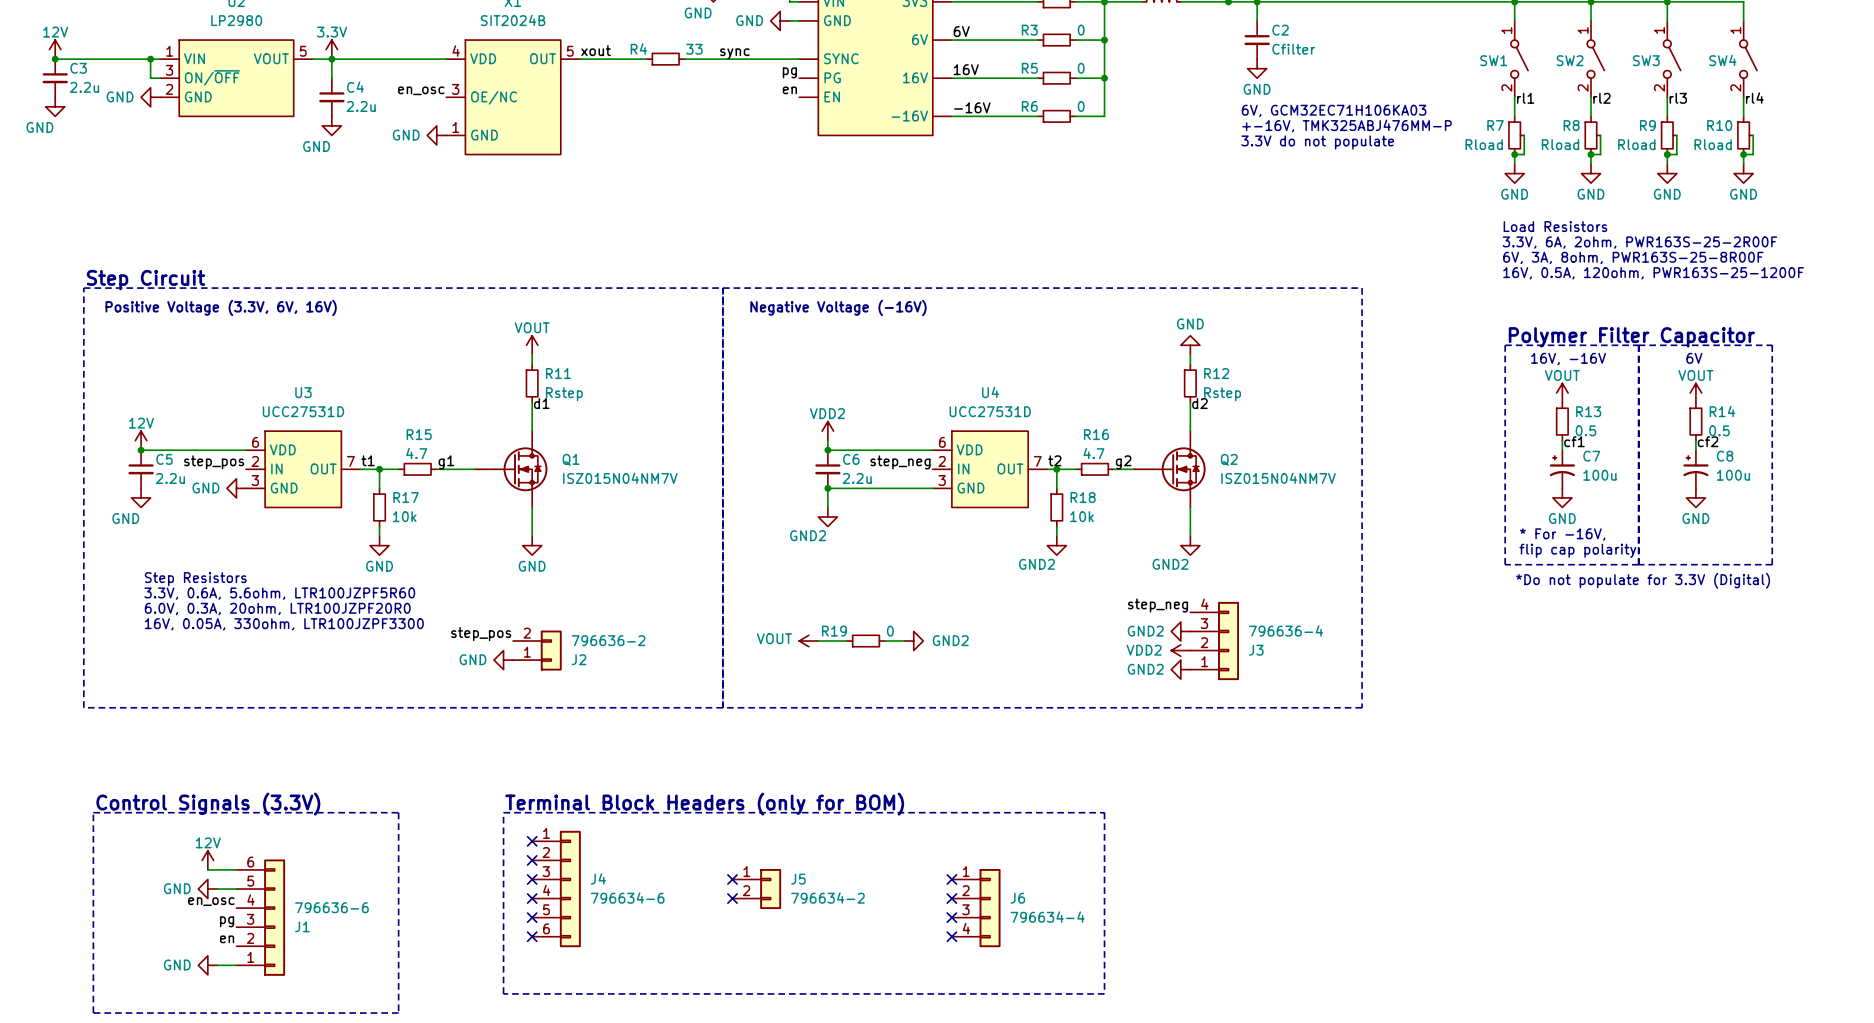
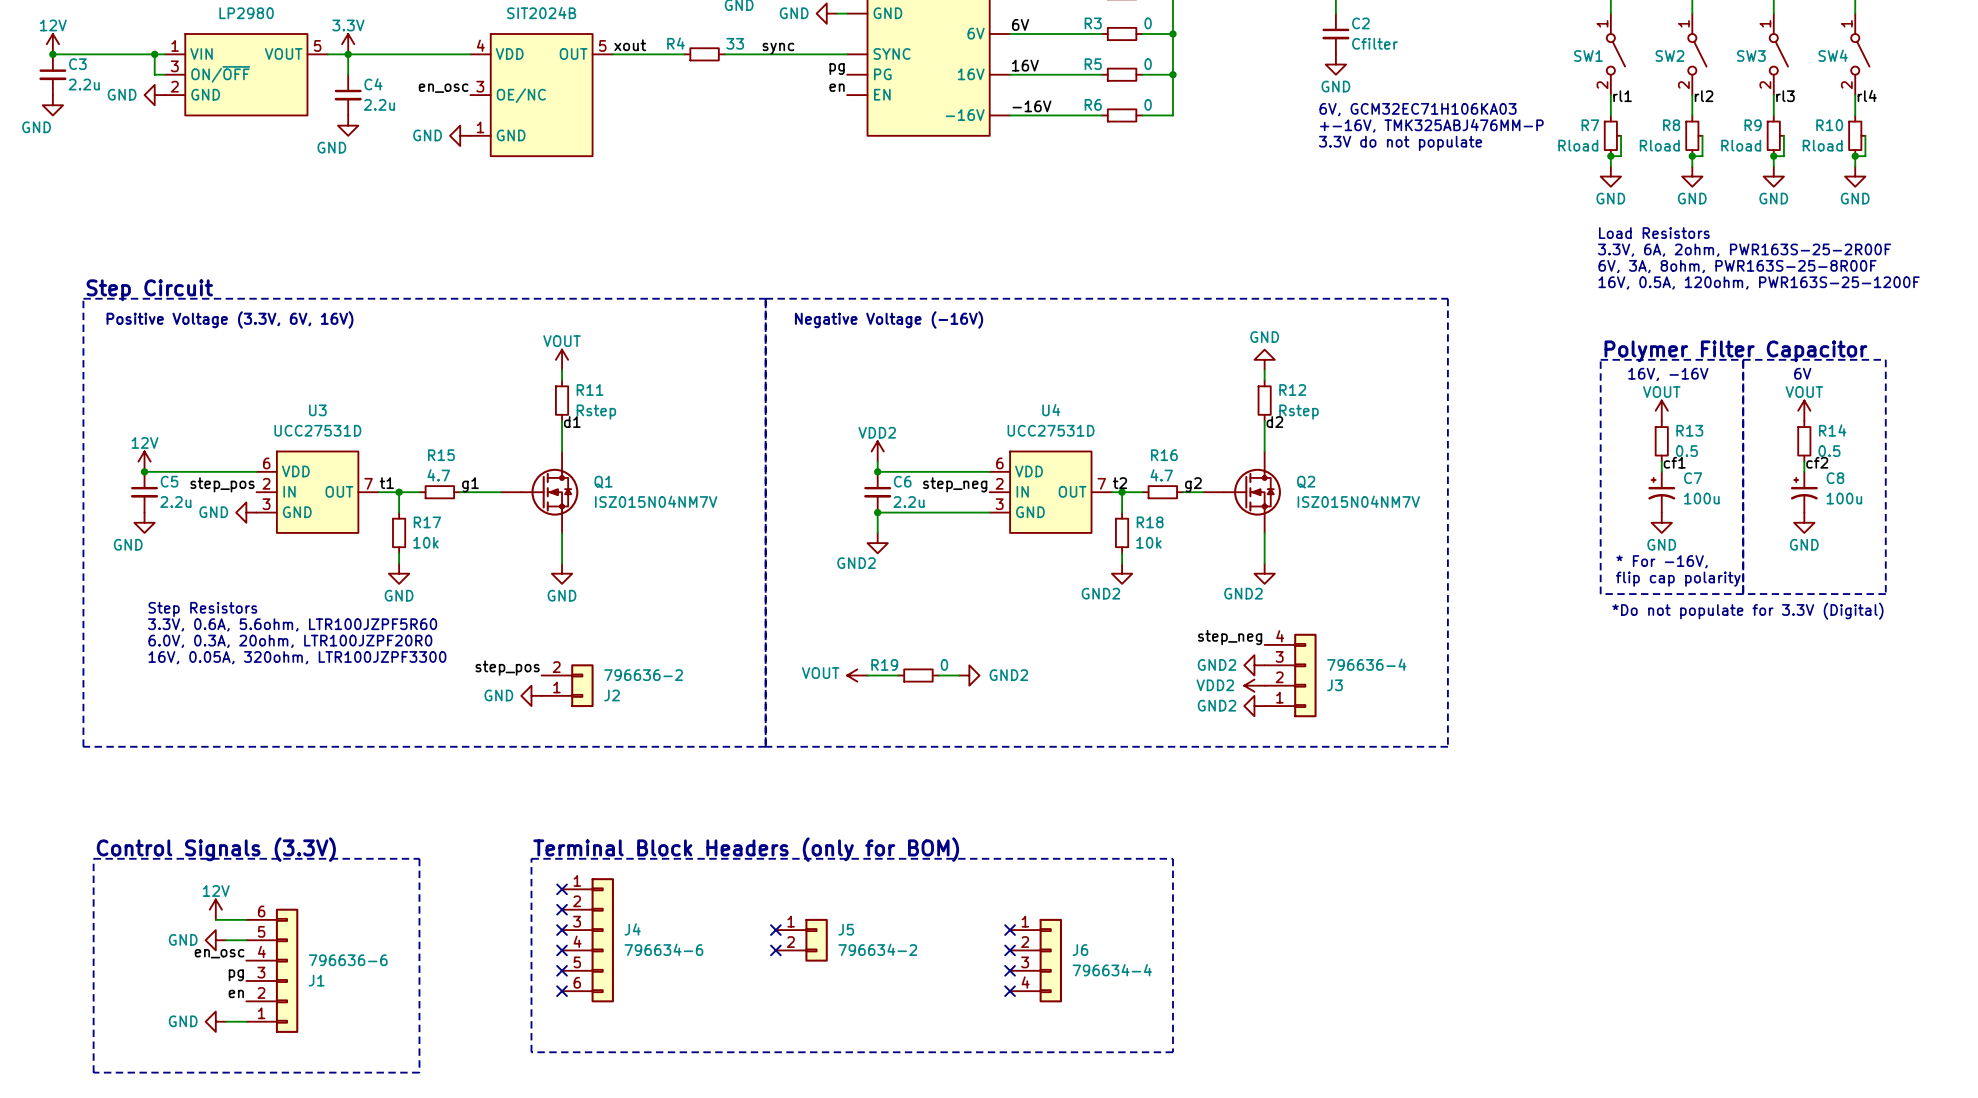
text: 16V, 0.05A, 330ohm, LTR100JZPF3300 (284, 624) -> 16V, 0.05A, 320ohm, LTR100JZPF3300 (297, 657)

